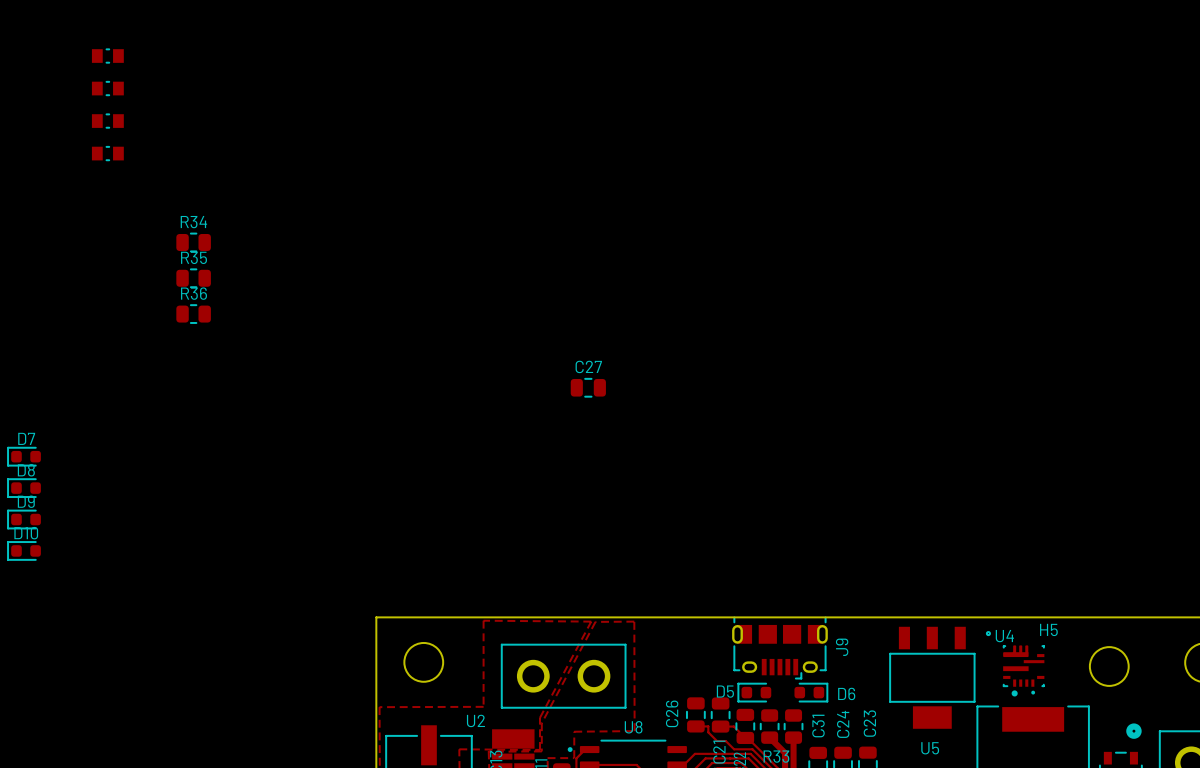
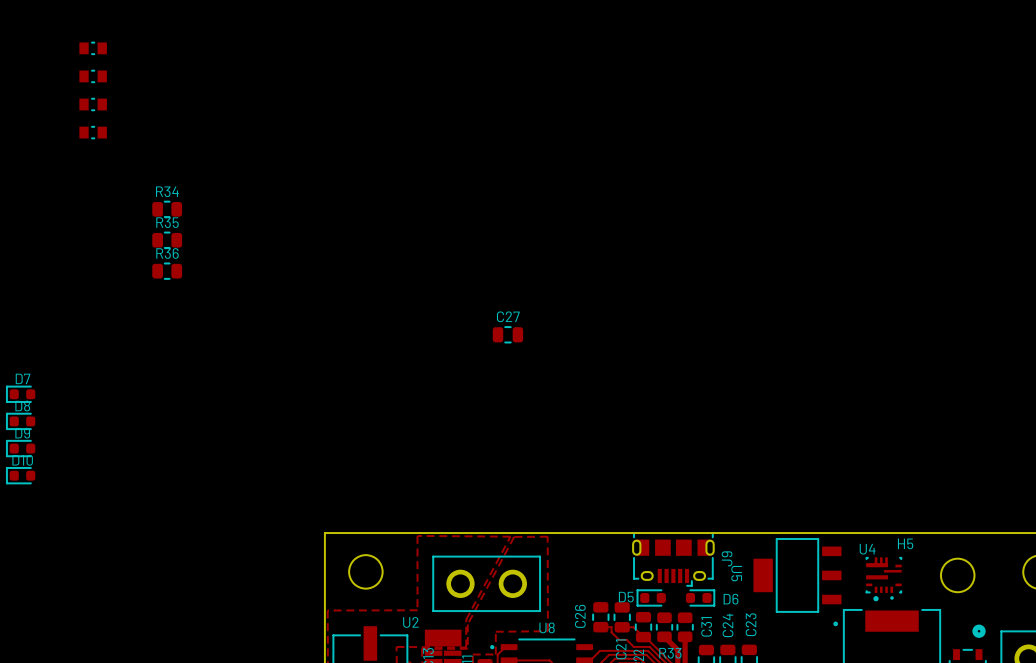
U5 rotation: 0° (940, 677) -> 90° clockwise (797, 582)

